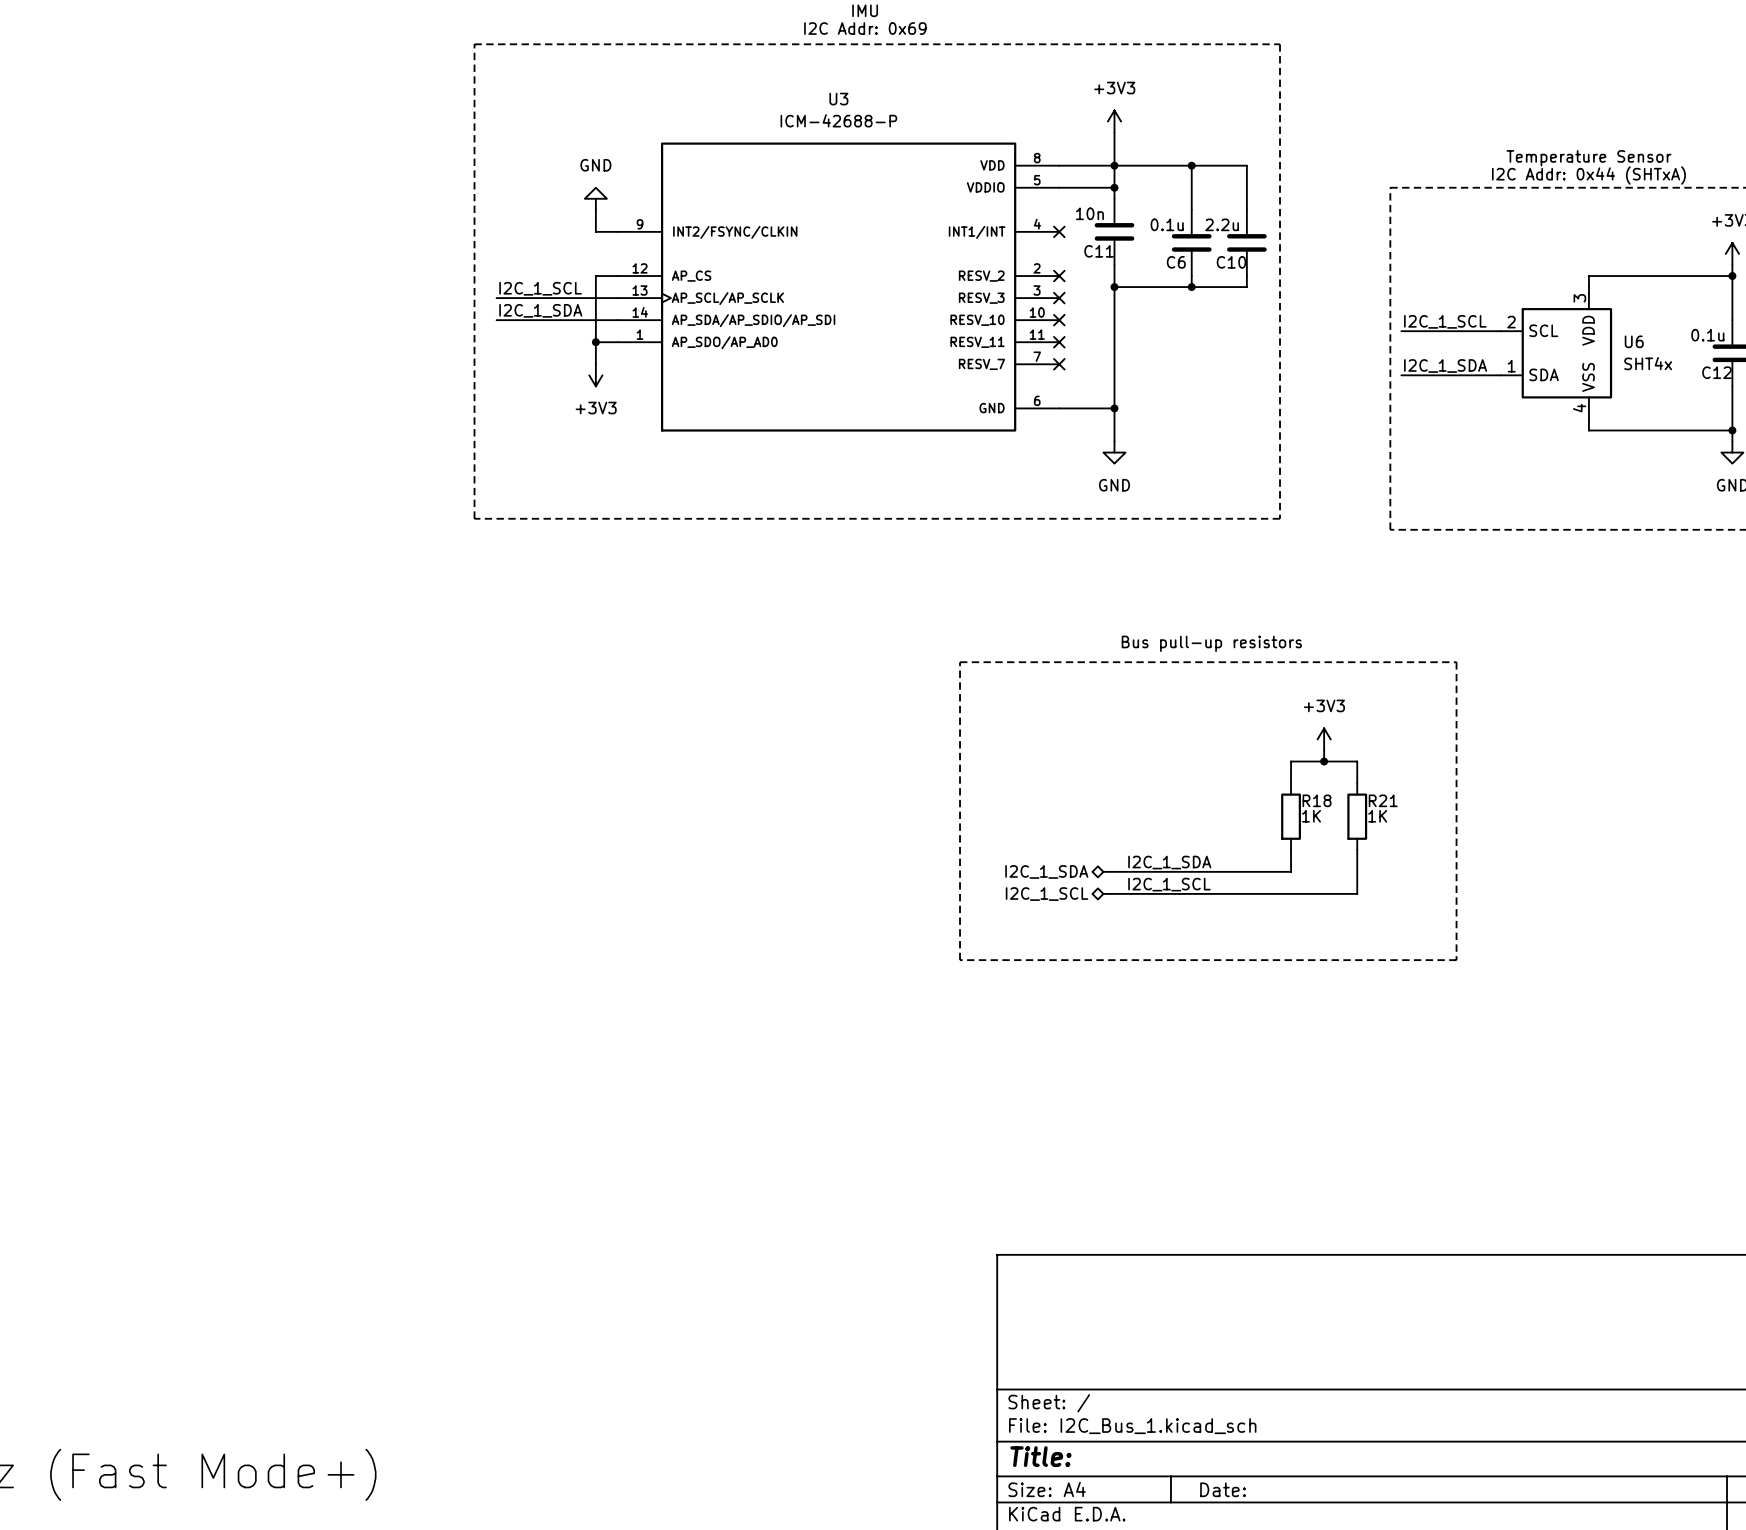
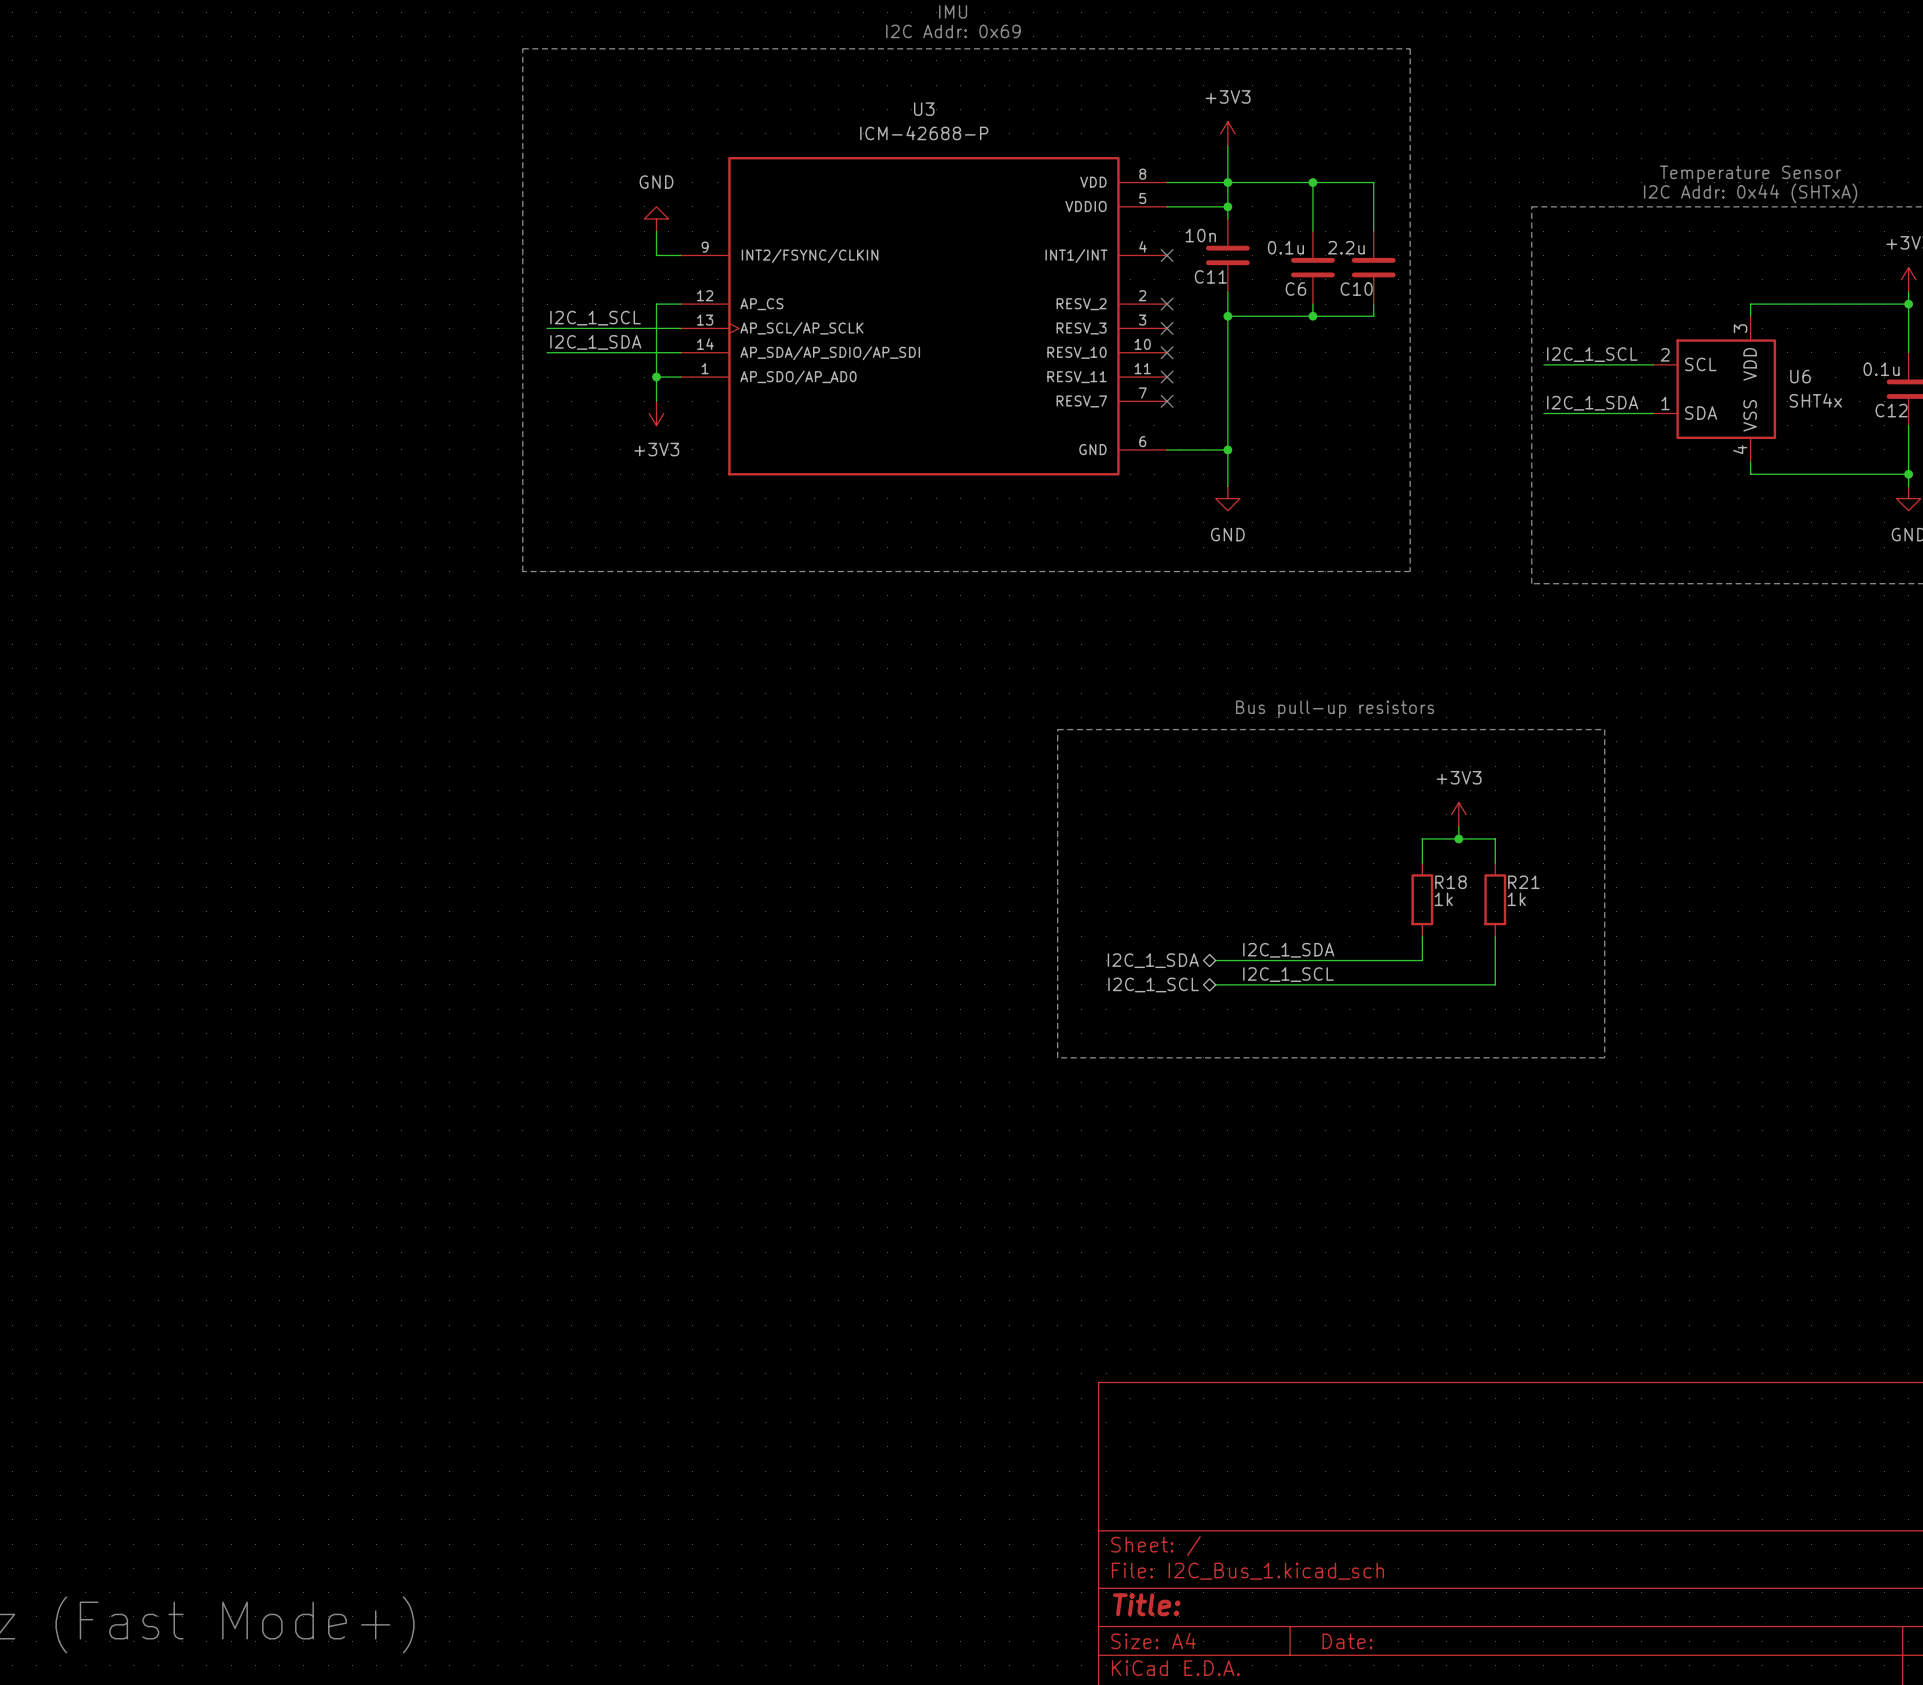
R18 value: 1K (1311, 816) -> 1k (1443, 899)
R21 value: 1K (1377, 816) -> 1k (1516, 899)

